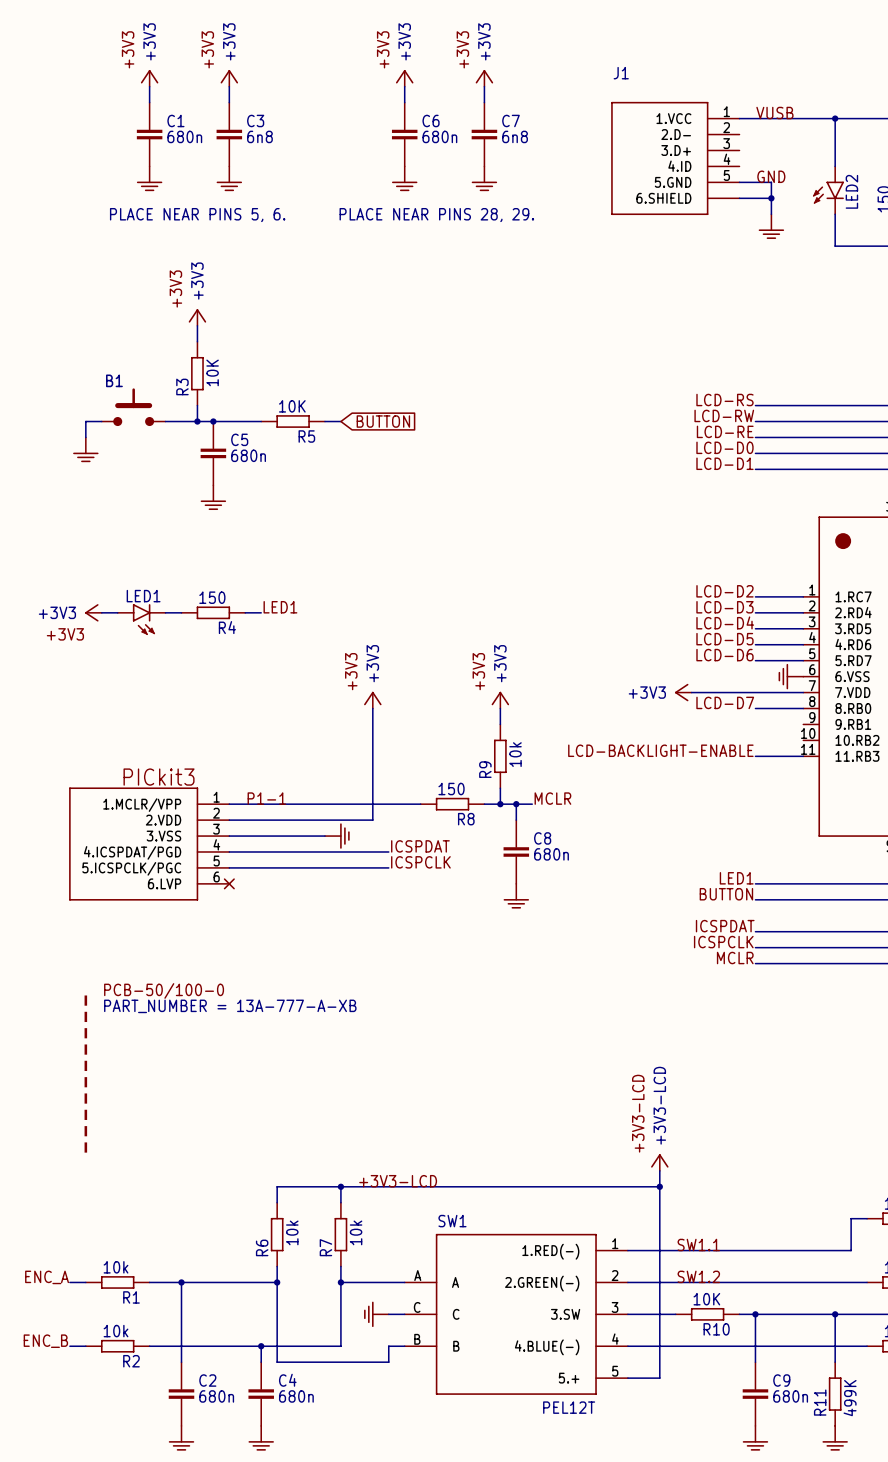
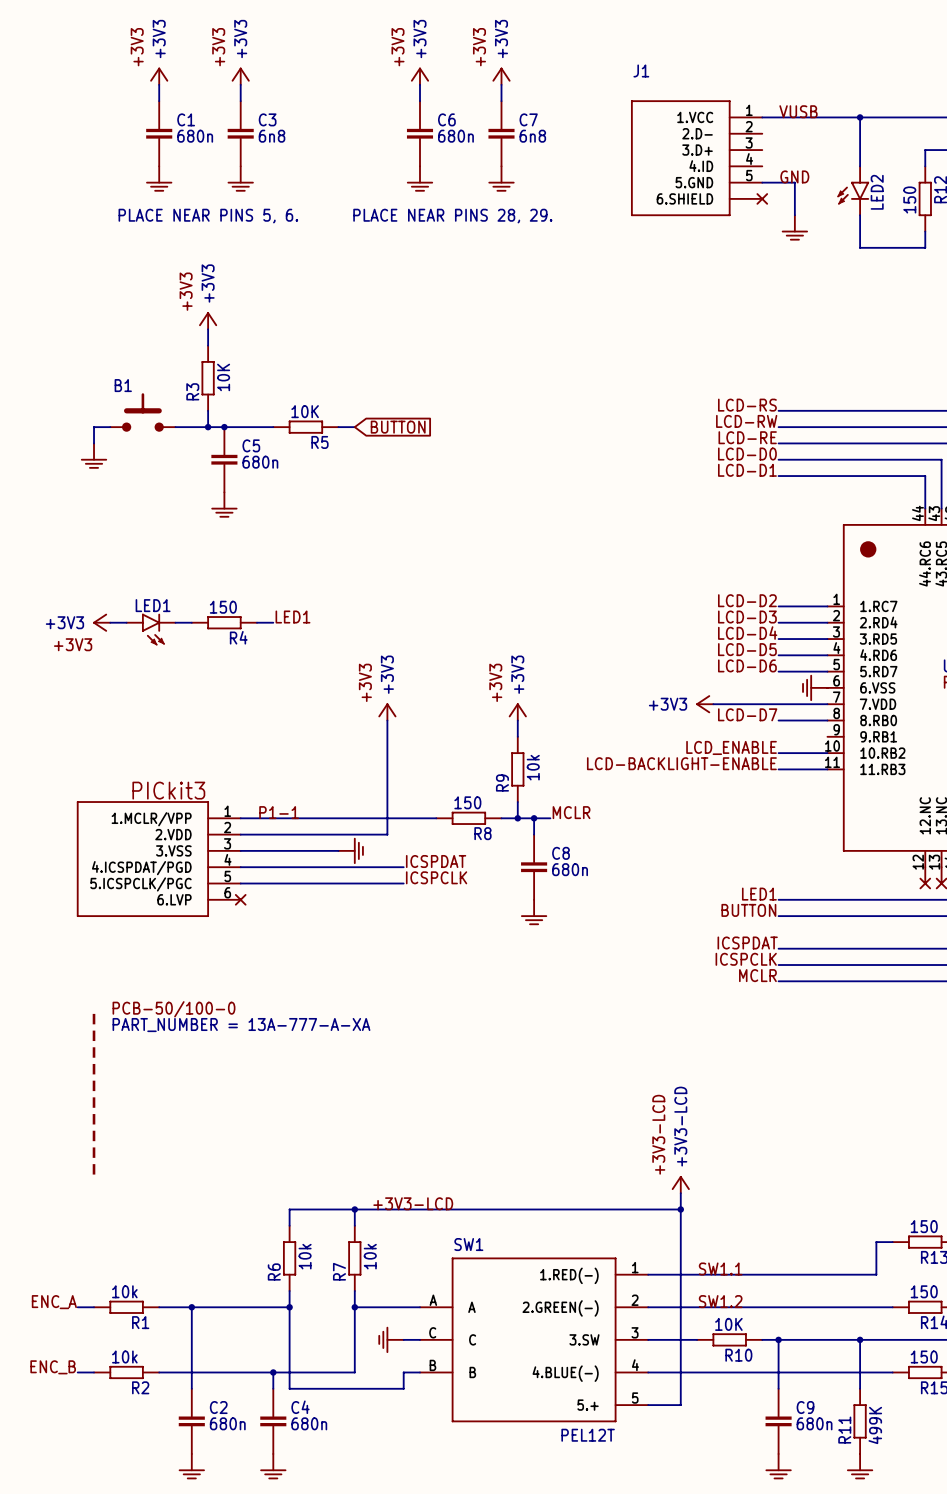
wire: (739, 198) (771, 198) -> none
part: none -> (762, 198)
junction: (771, 198) -> none
label: none -> LCD_ENABLE (731, 747)
wire: none -> (778, 753) (827, 753)
part text: PART_NUMBER = 13A-777-A-XB (230, 1006) -> PART_NUMBER = 13A-777-A-XA (241, 1025)

